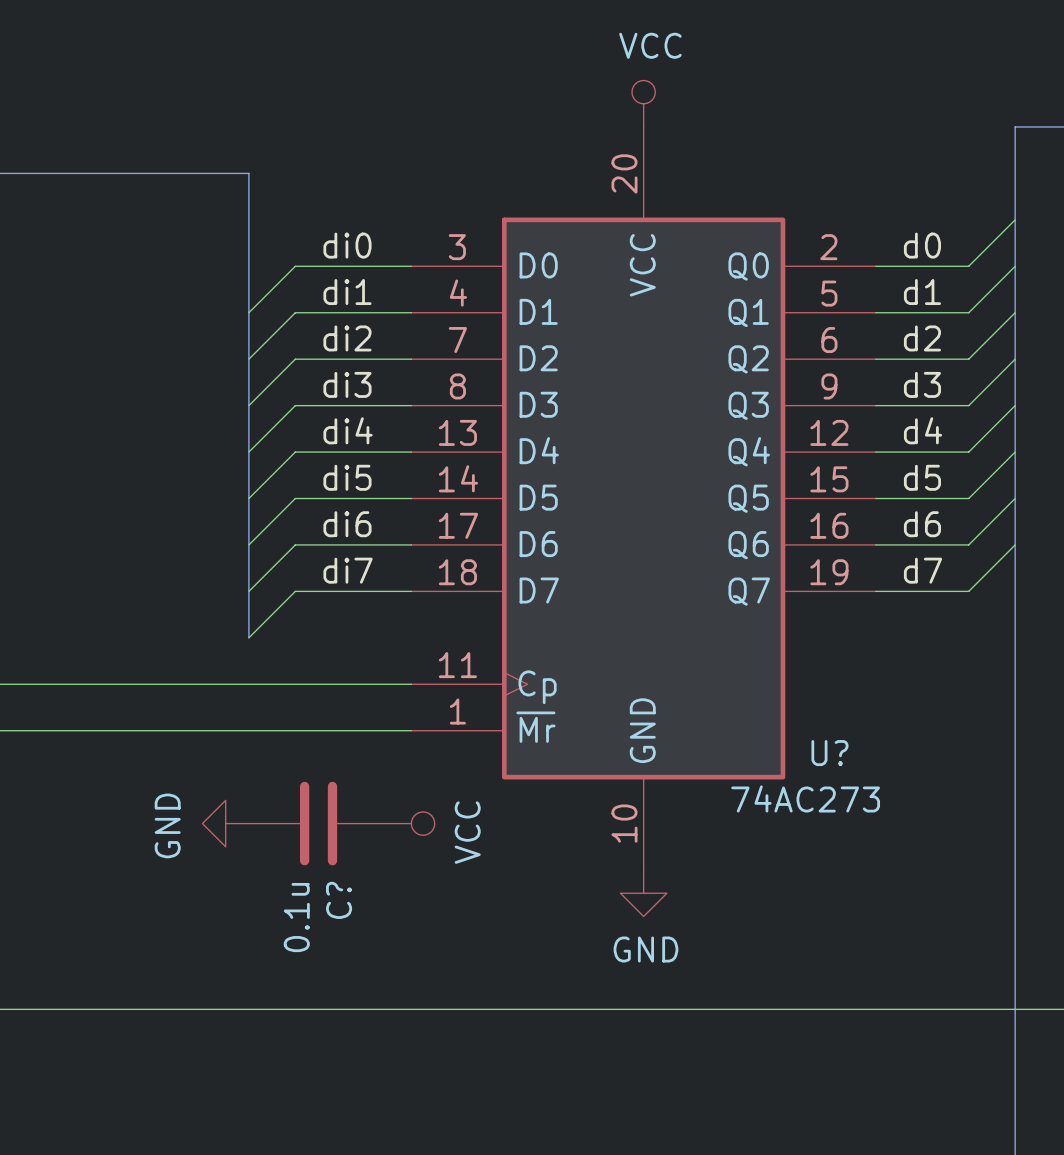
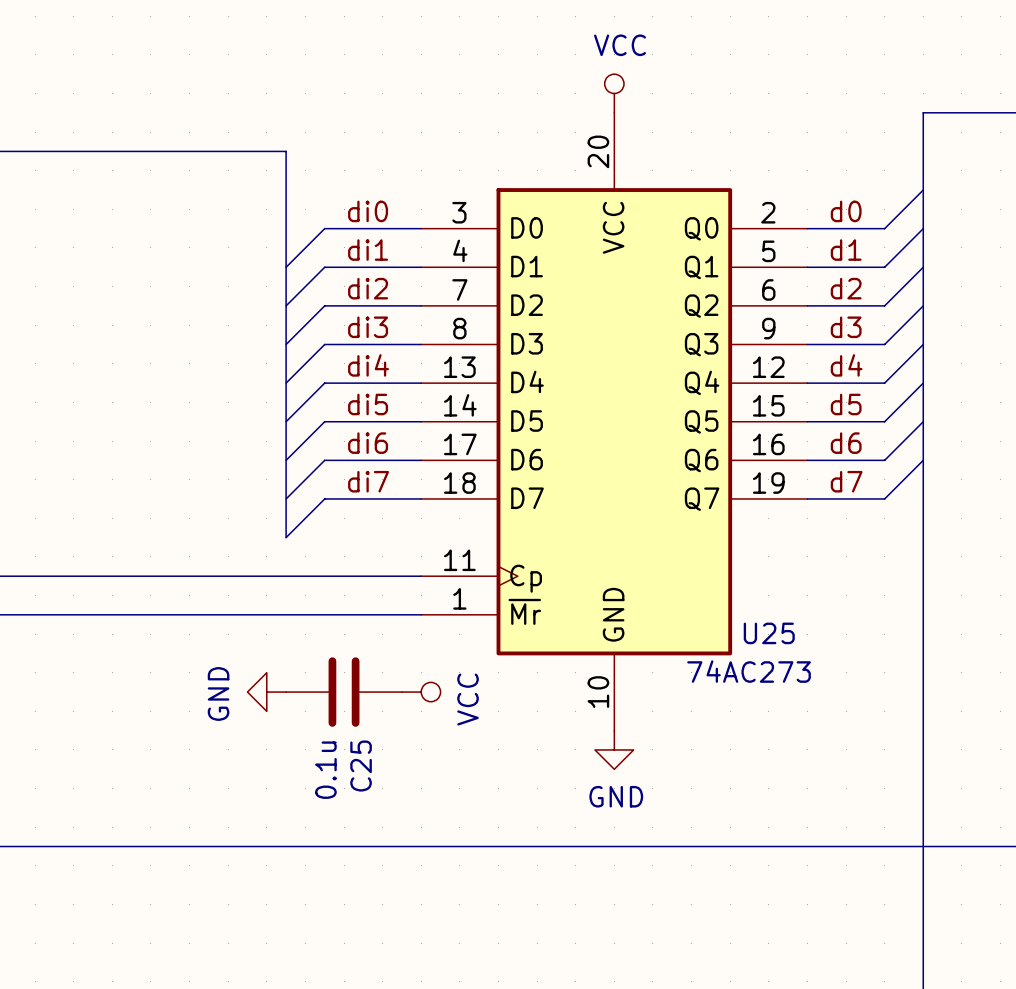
U? name: U? (829, 753) -> U25 (769, 633)
C? name: C? (339, 900) -> C25 (361, 766)

